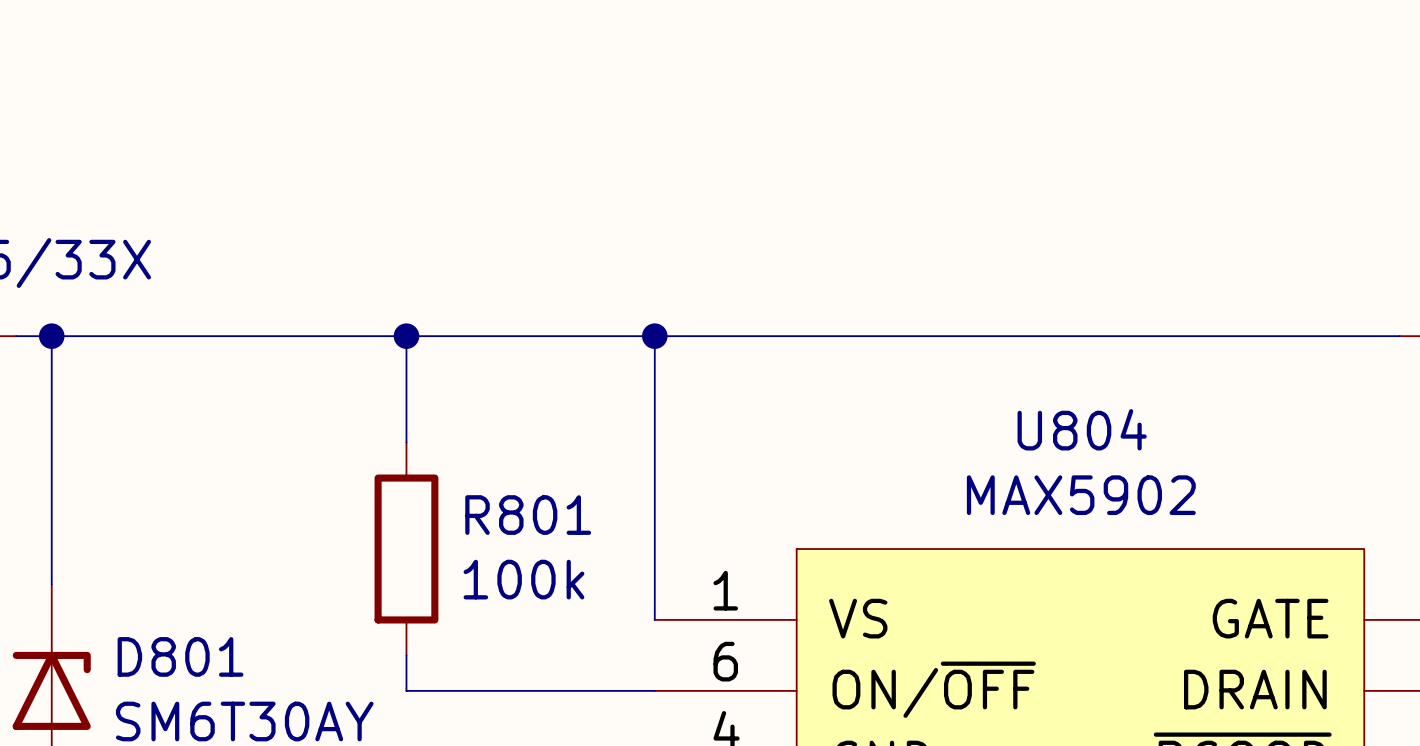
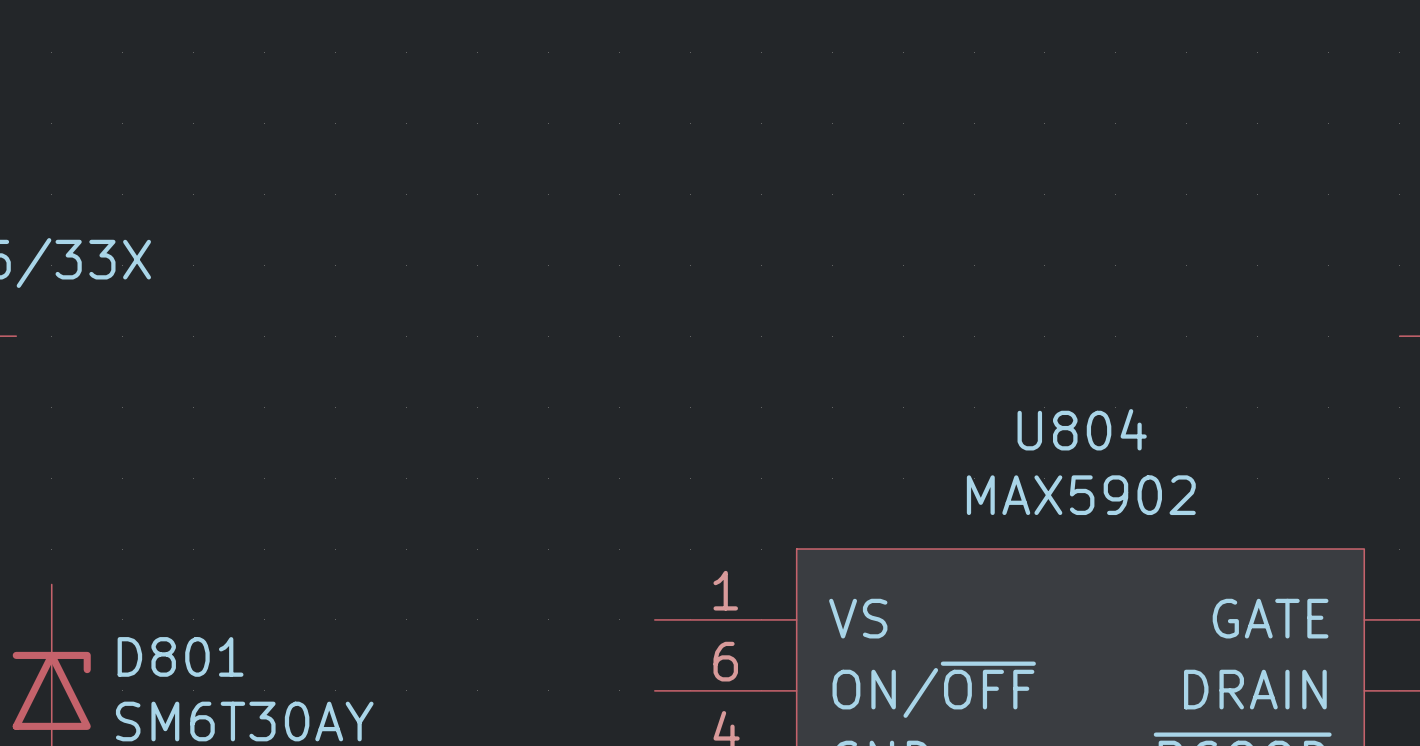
wire: (16, 336) (1399, 336) -> none
wire: (51, 336) (51, 584) -> none
junction: (51, 336) -> none
wire: (406, 336) (406, 442) -> none
junction: (406, 336) -> none
wire: (654, 336) (654, 619) -> none
junction: (654, 336) -> none
R801: 100k (406, 549) -> none
wire: (406, 655) (406, 690) (654, 690) -> none

